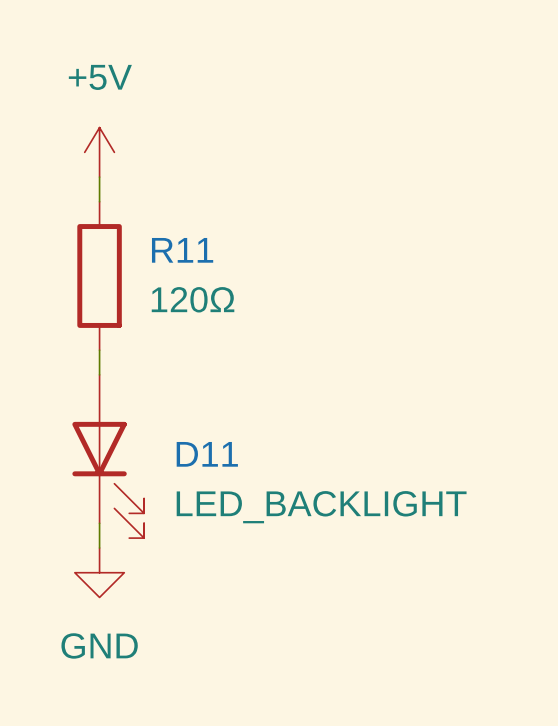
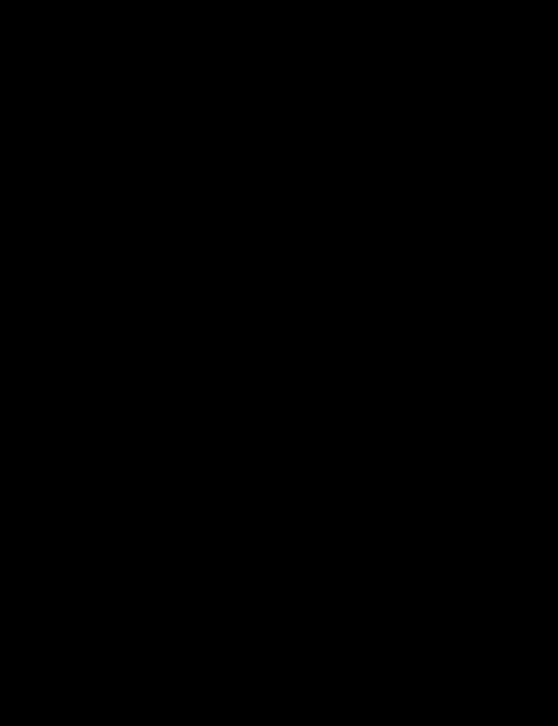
power symbol: +5V (99, 152) -> none
wire: (99, 177) (99, 201) -> none
R11: 120Ω (99, 275) -> none
wire: (99, 350) (99, 374) -> none
D11: LED_BACKLIGHT (108, 456) -> none
wire: (99, 523) (99, 547) -> none
power symbol: GND (99, 572) -> none

